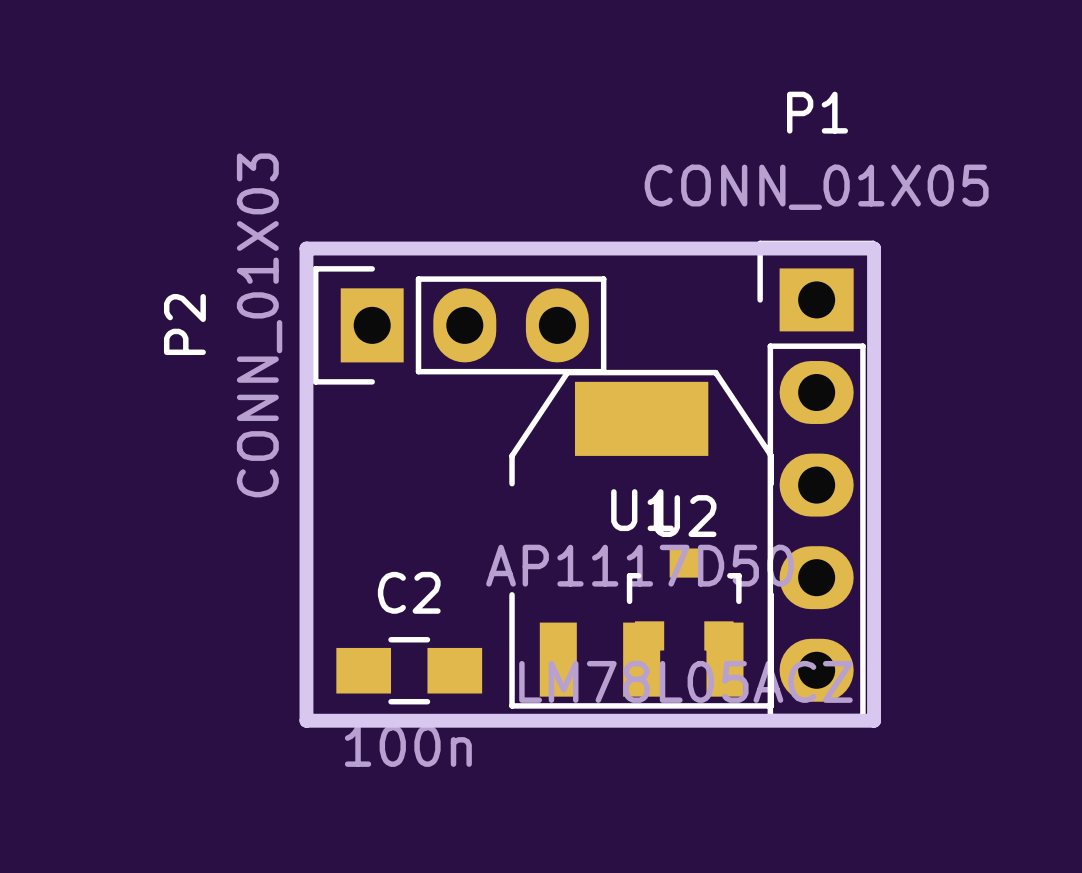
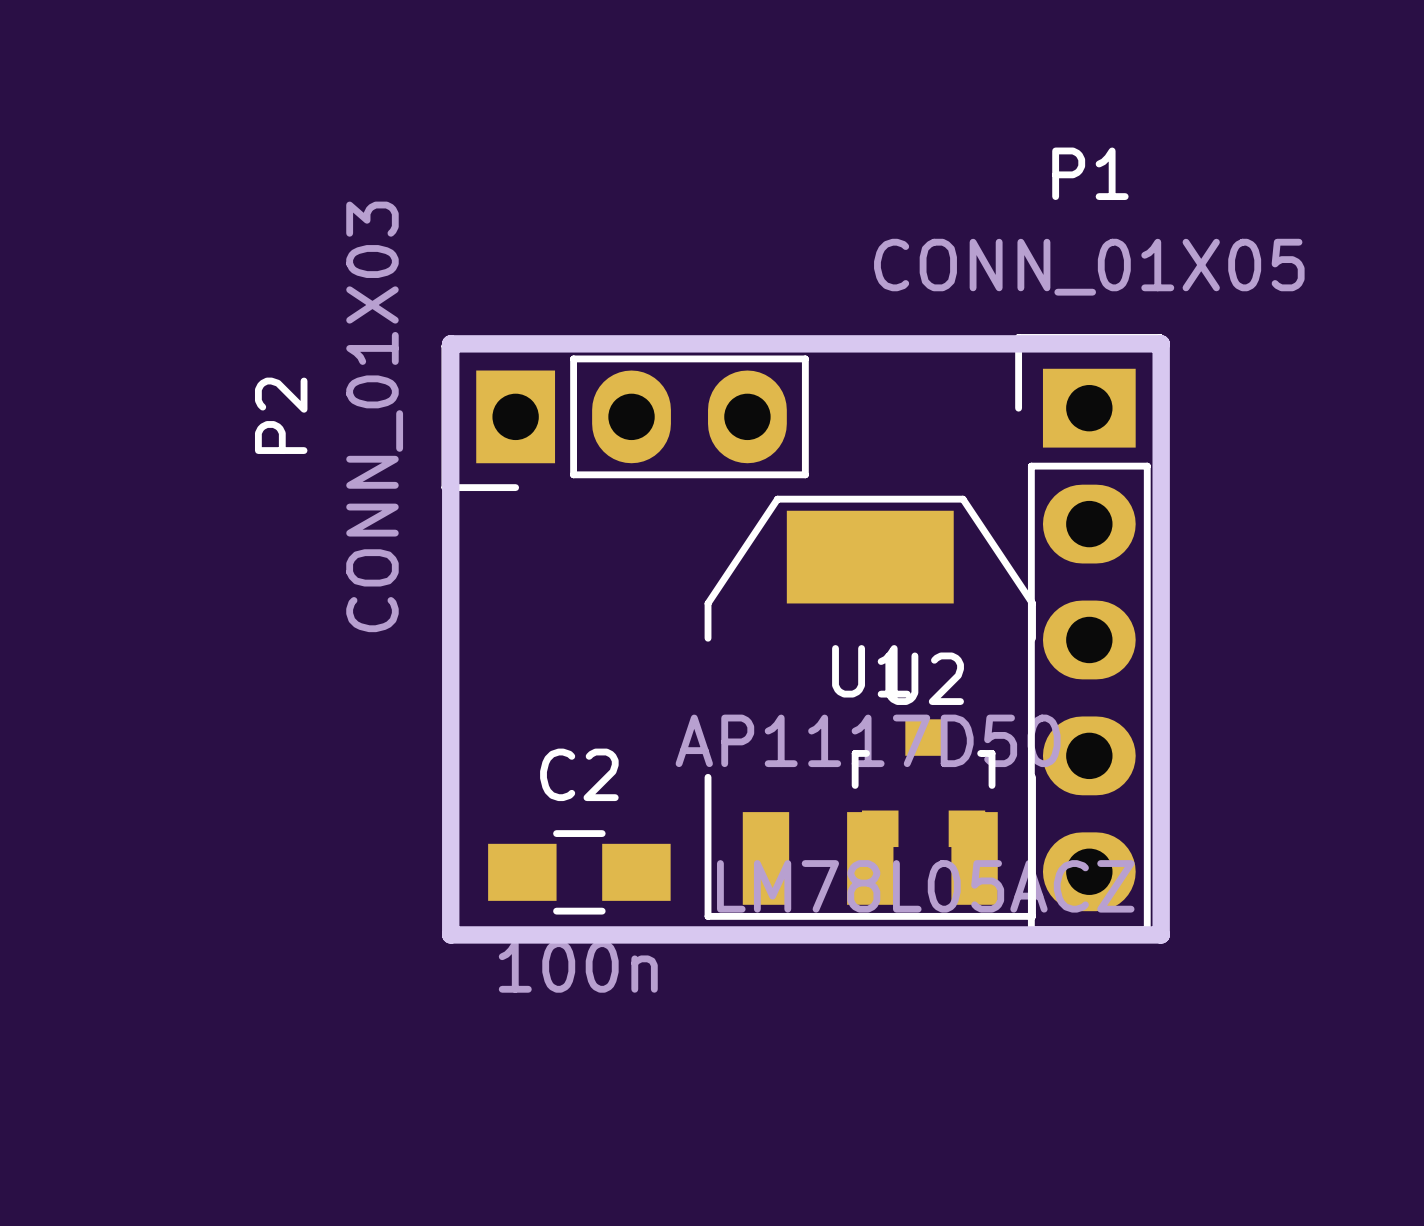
P2 position: (459, 325) -> (625, 416)

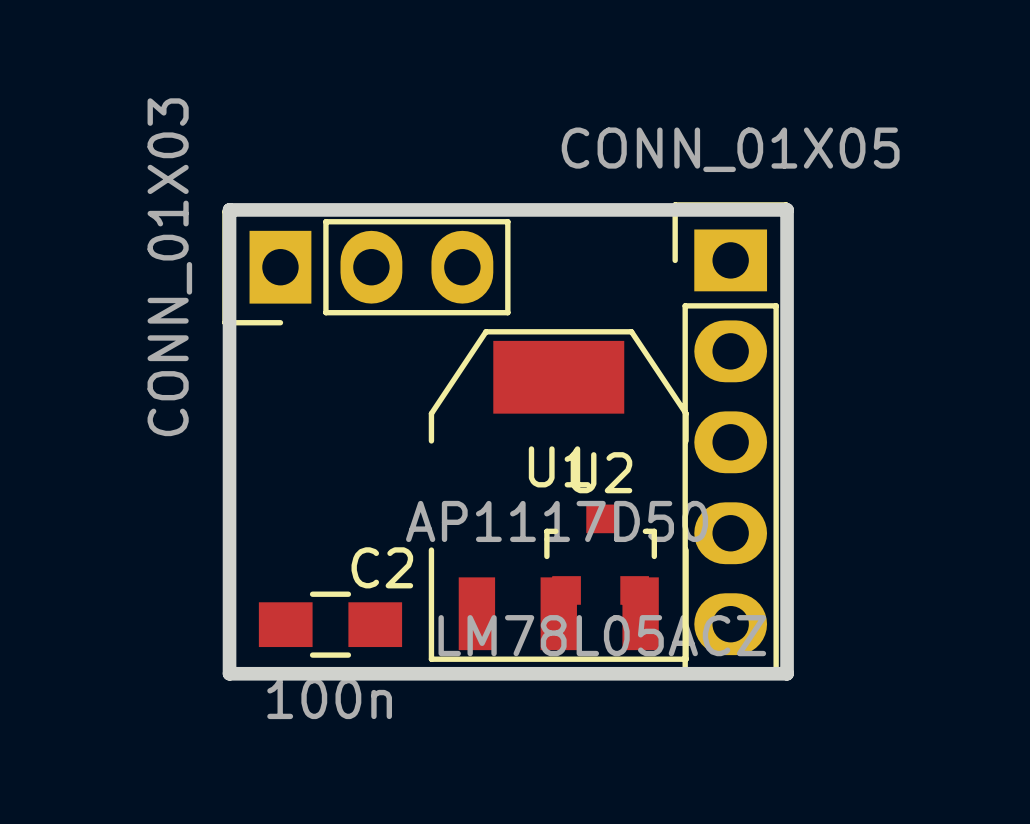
P1 name: P1 (1090, 173) -> none
P2 name: P2 (281, 415) -> none
C2 name position: C2 (579, 774) -> C2 (382, 567)

